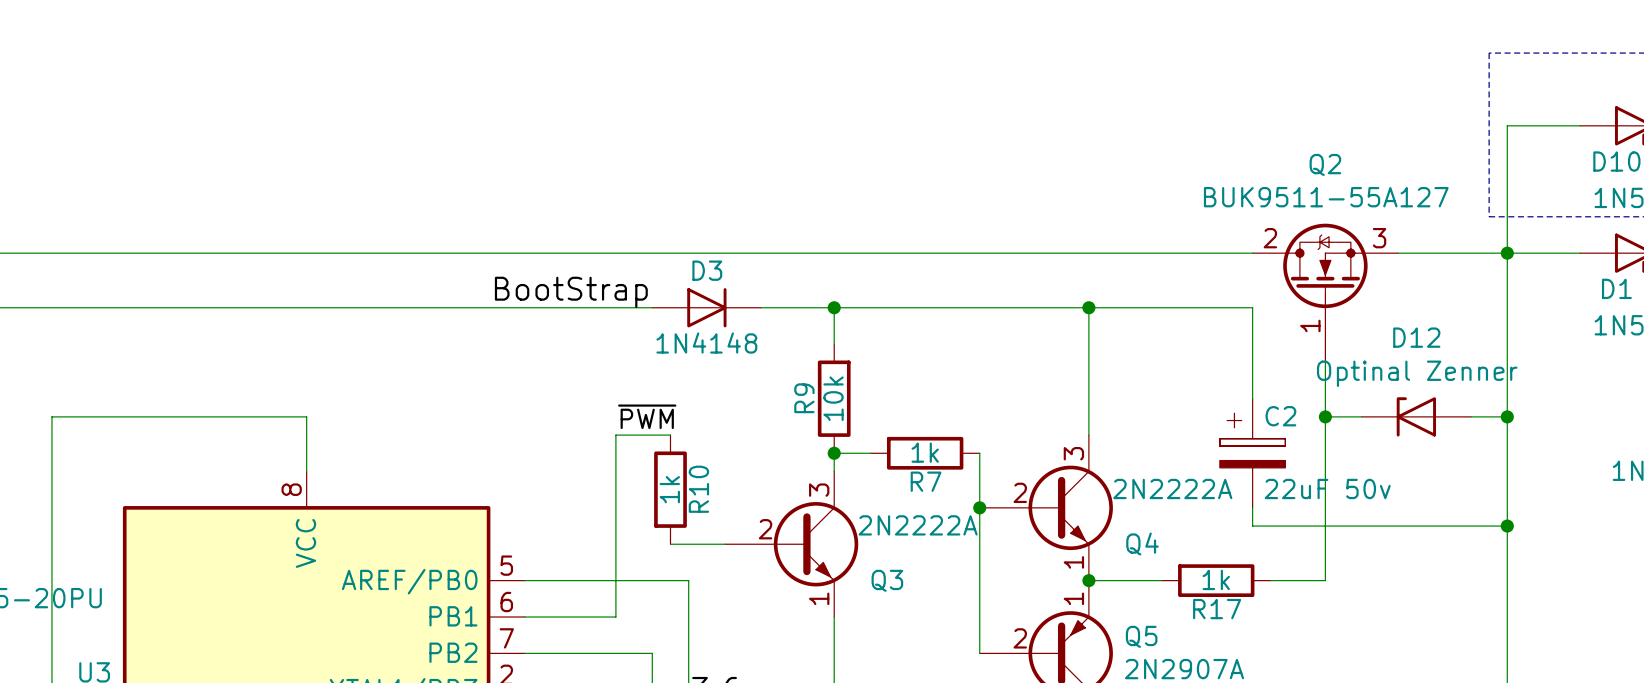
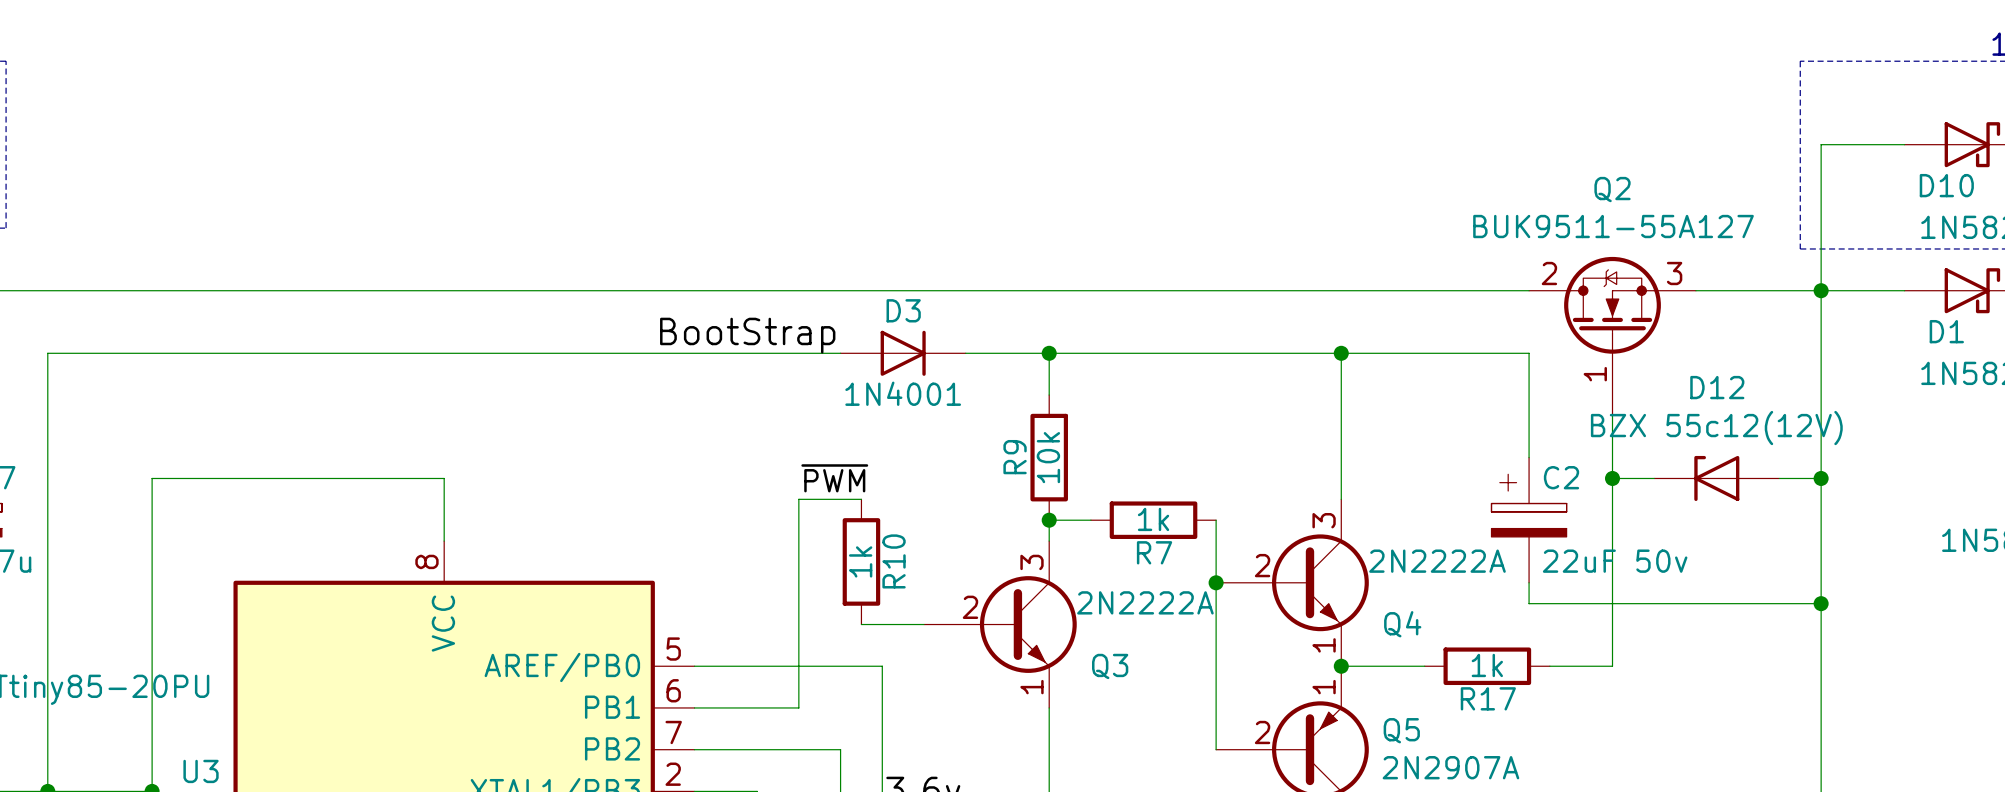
D3 value: 1N4148 (706, 343) -> 1N4001 (903, 393)
D12 value: Optinal Zenner (1417, 373) -> BZX 55c12(12V) (1716, 428)

